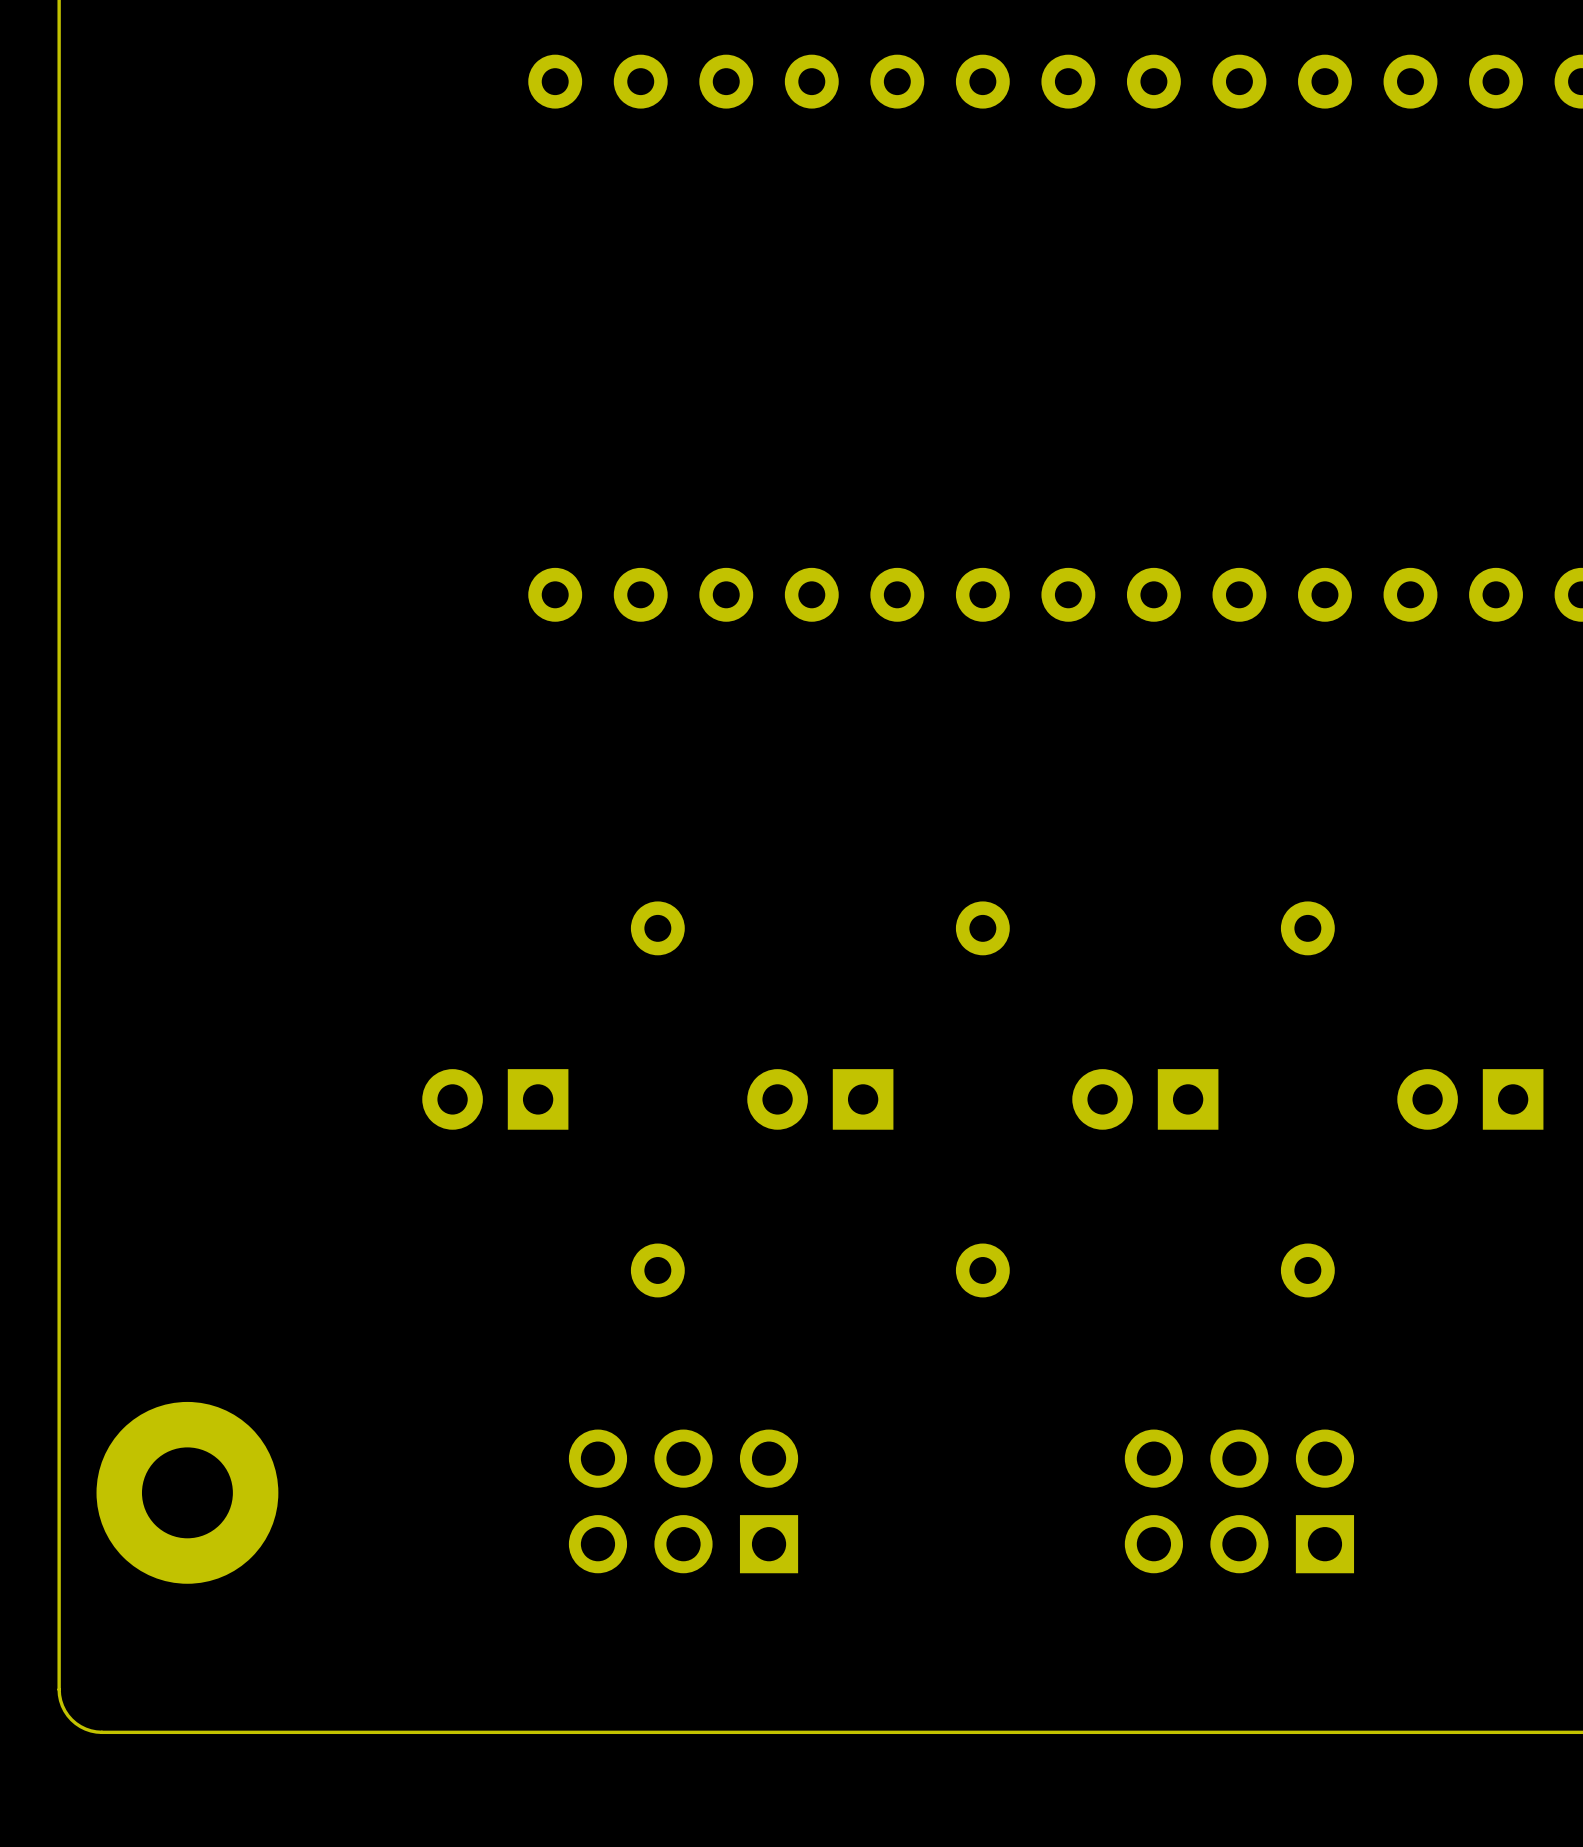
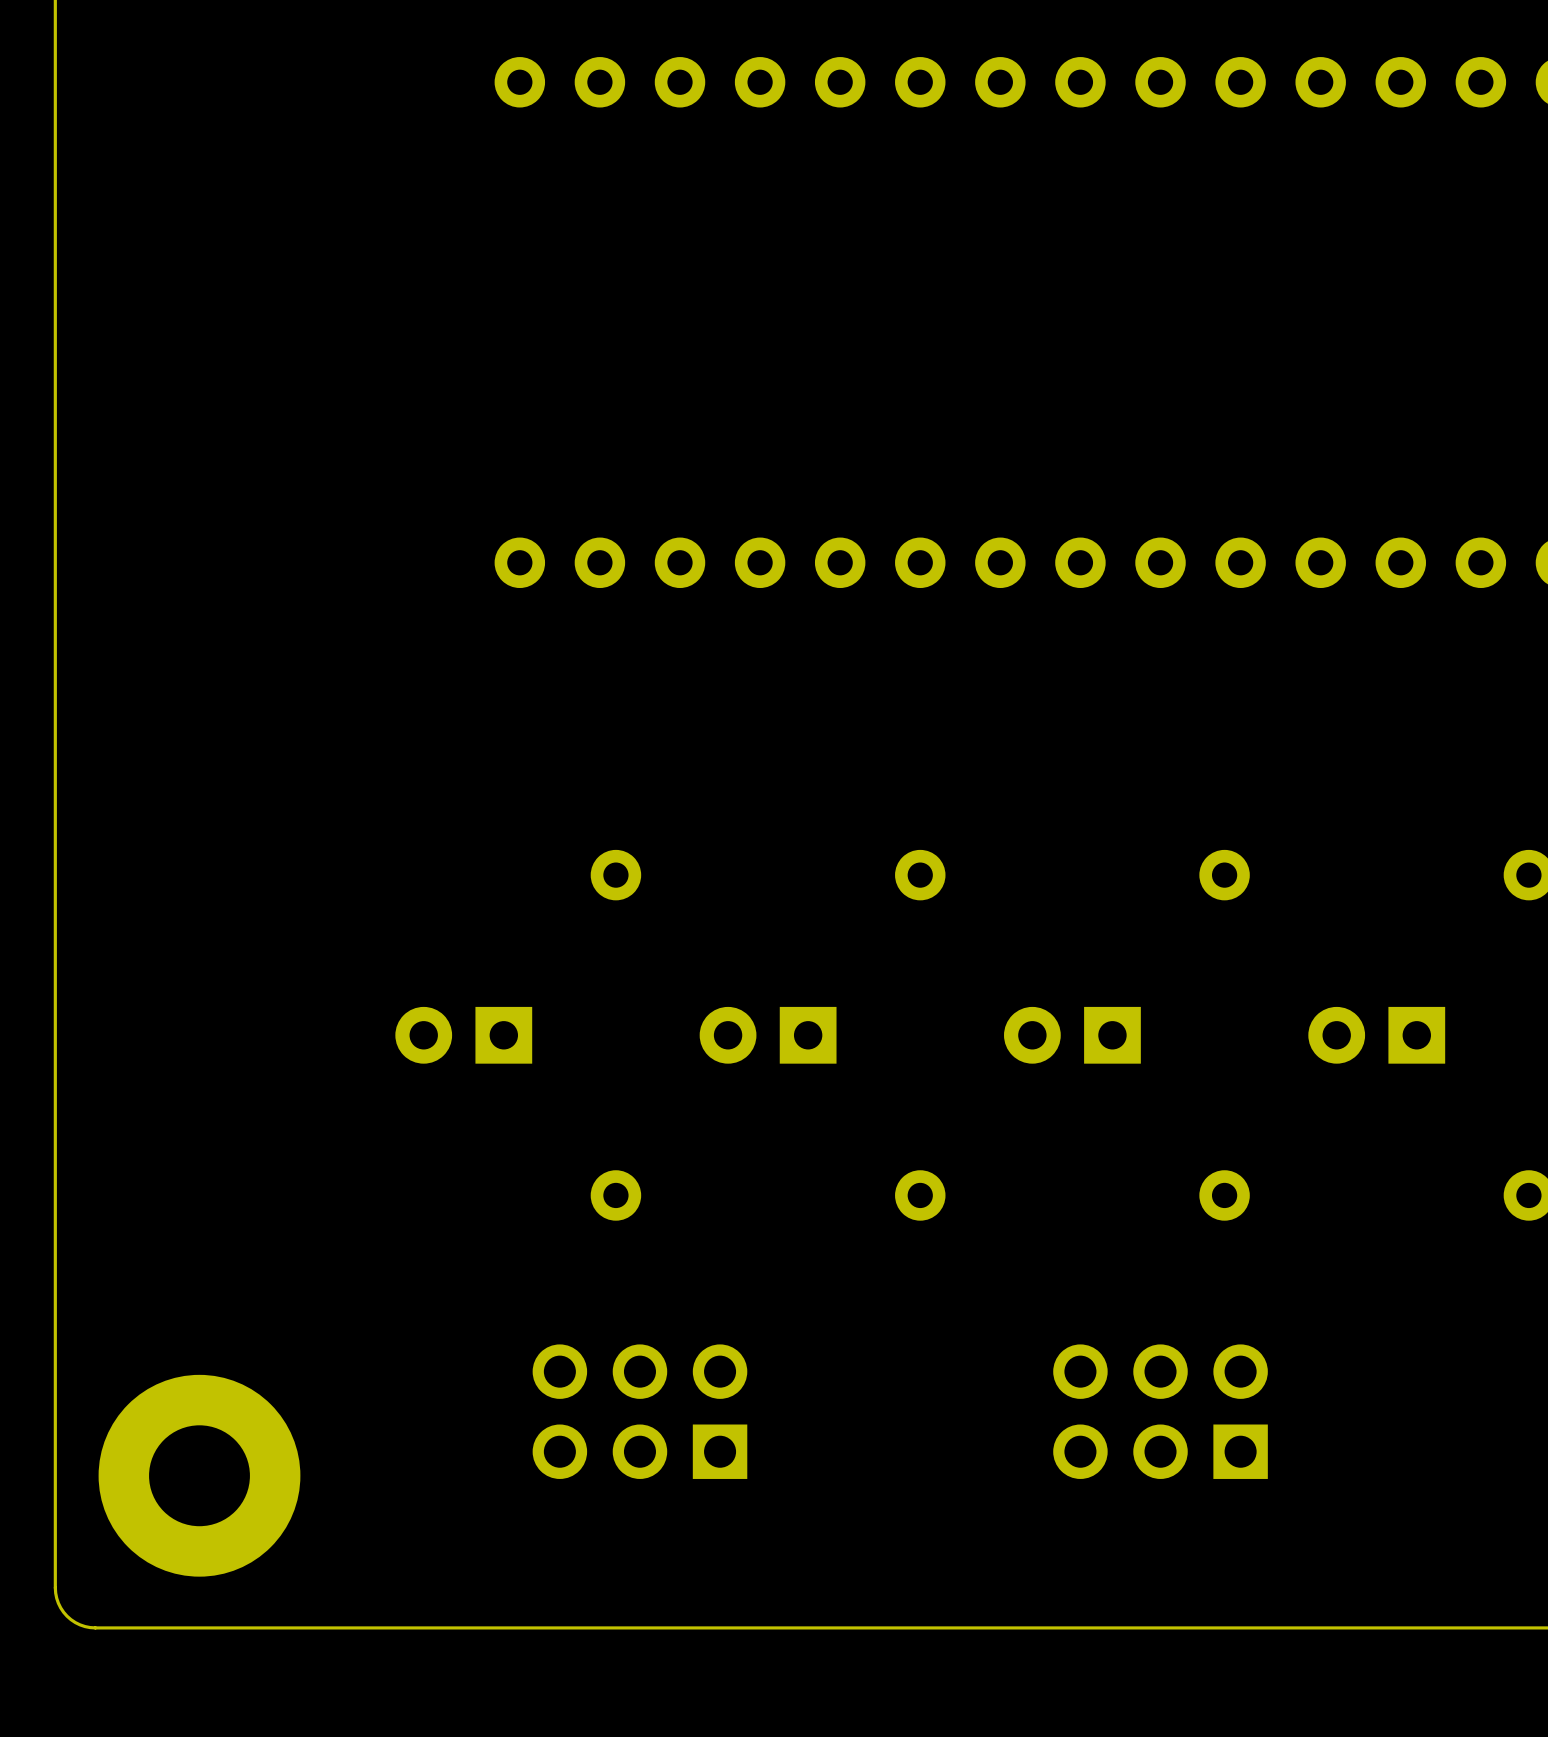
part: (187, 1492) -> none
part: none -> (199, 1475)

